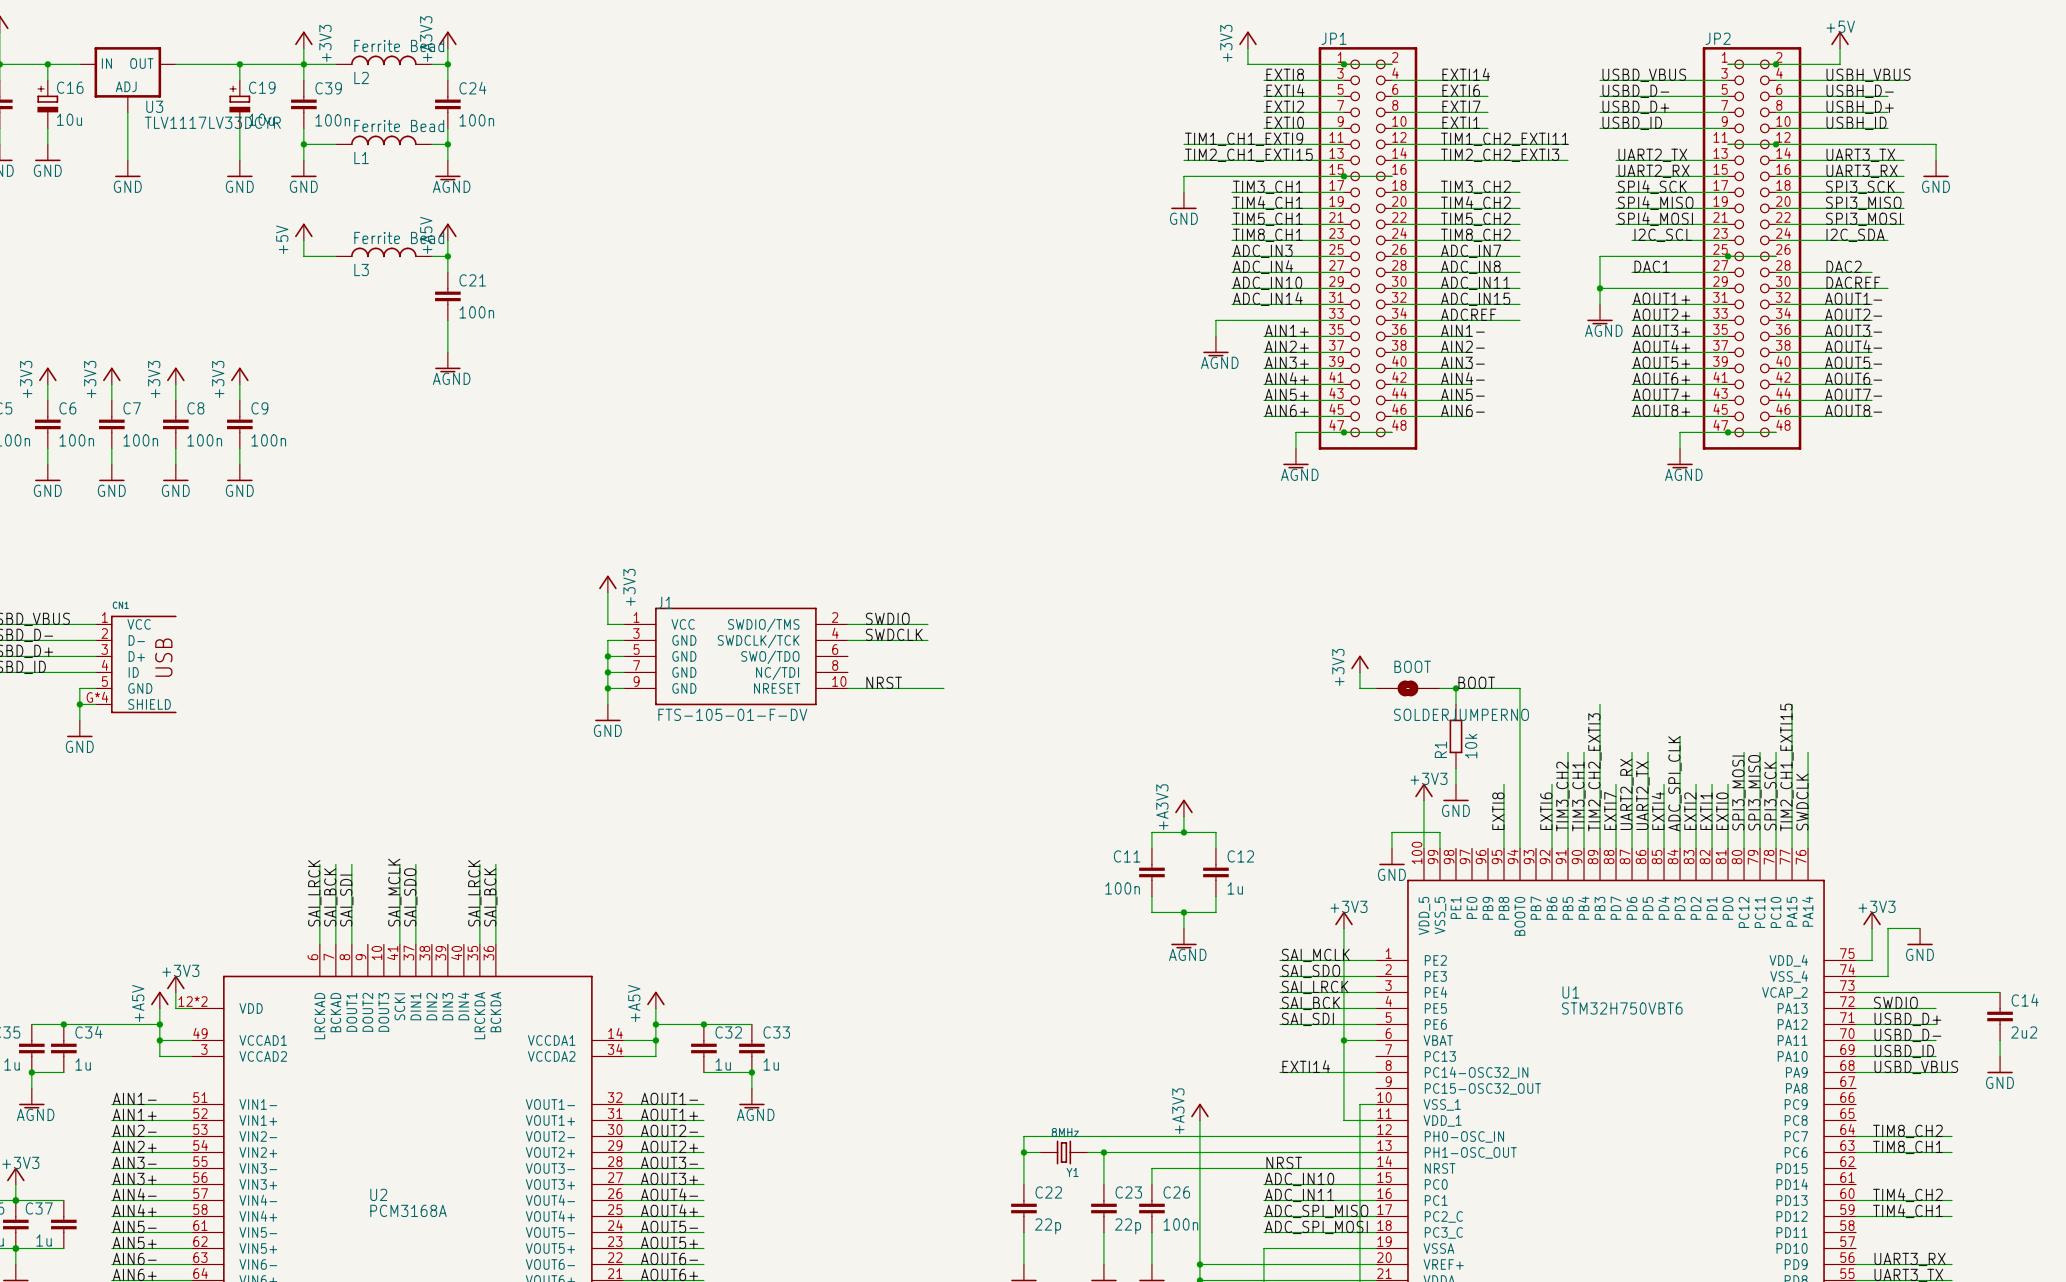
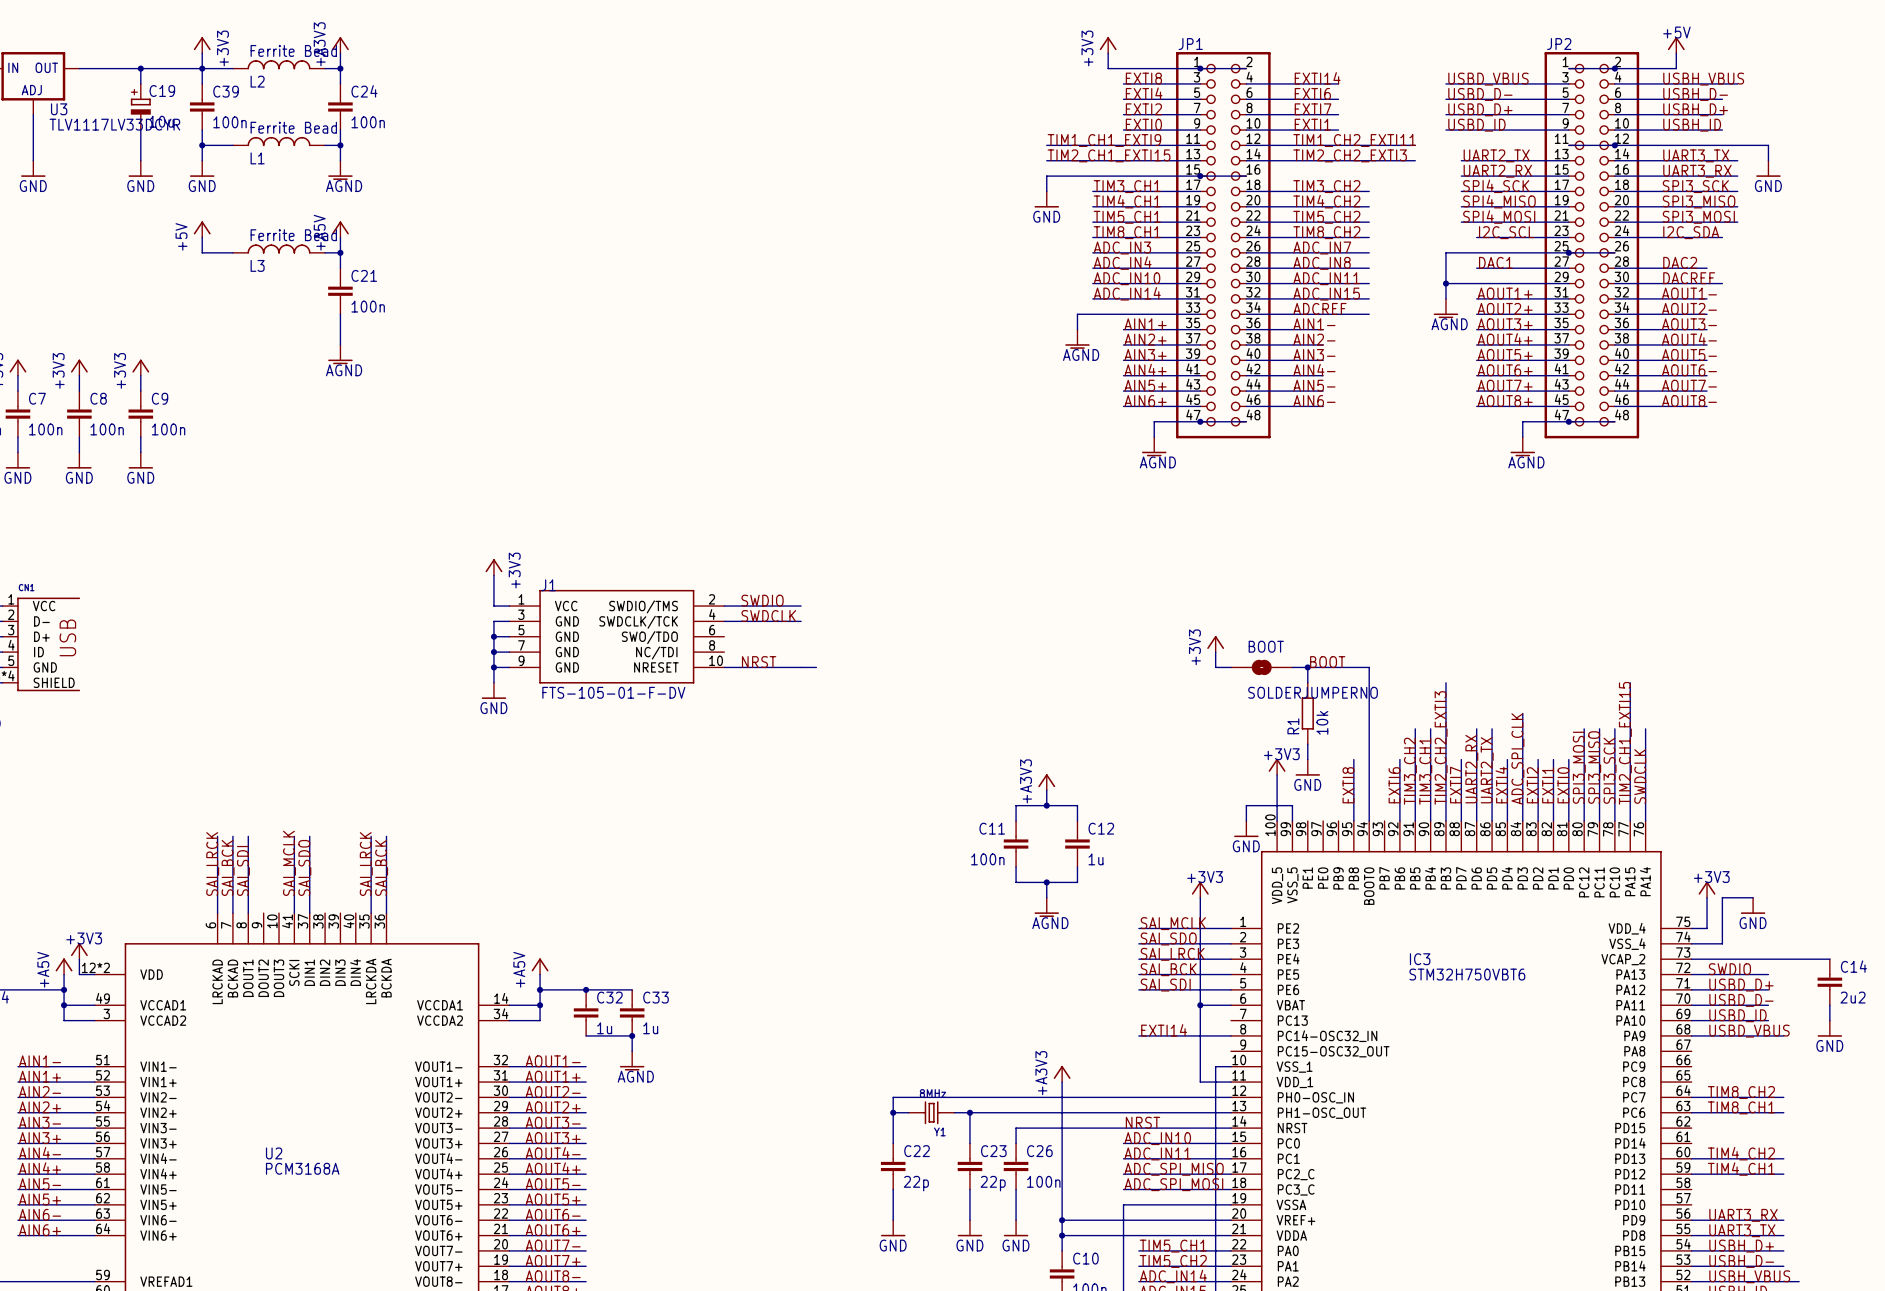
U1 name: U1 (1570, 992) -> IC3 (1420, 959)

